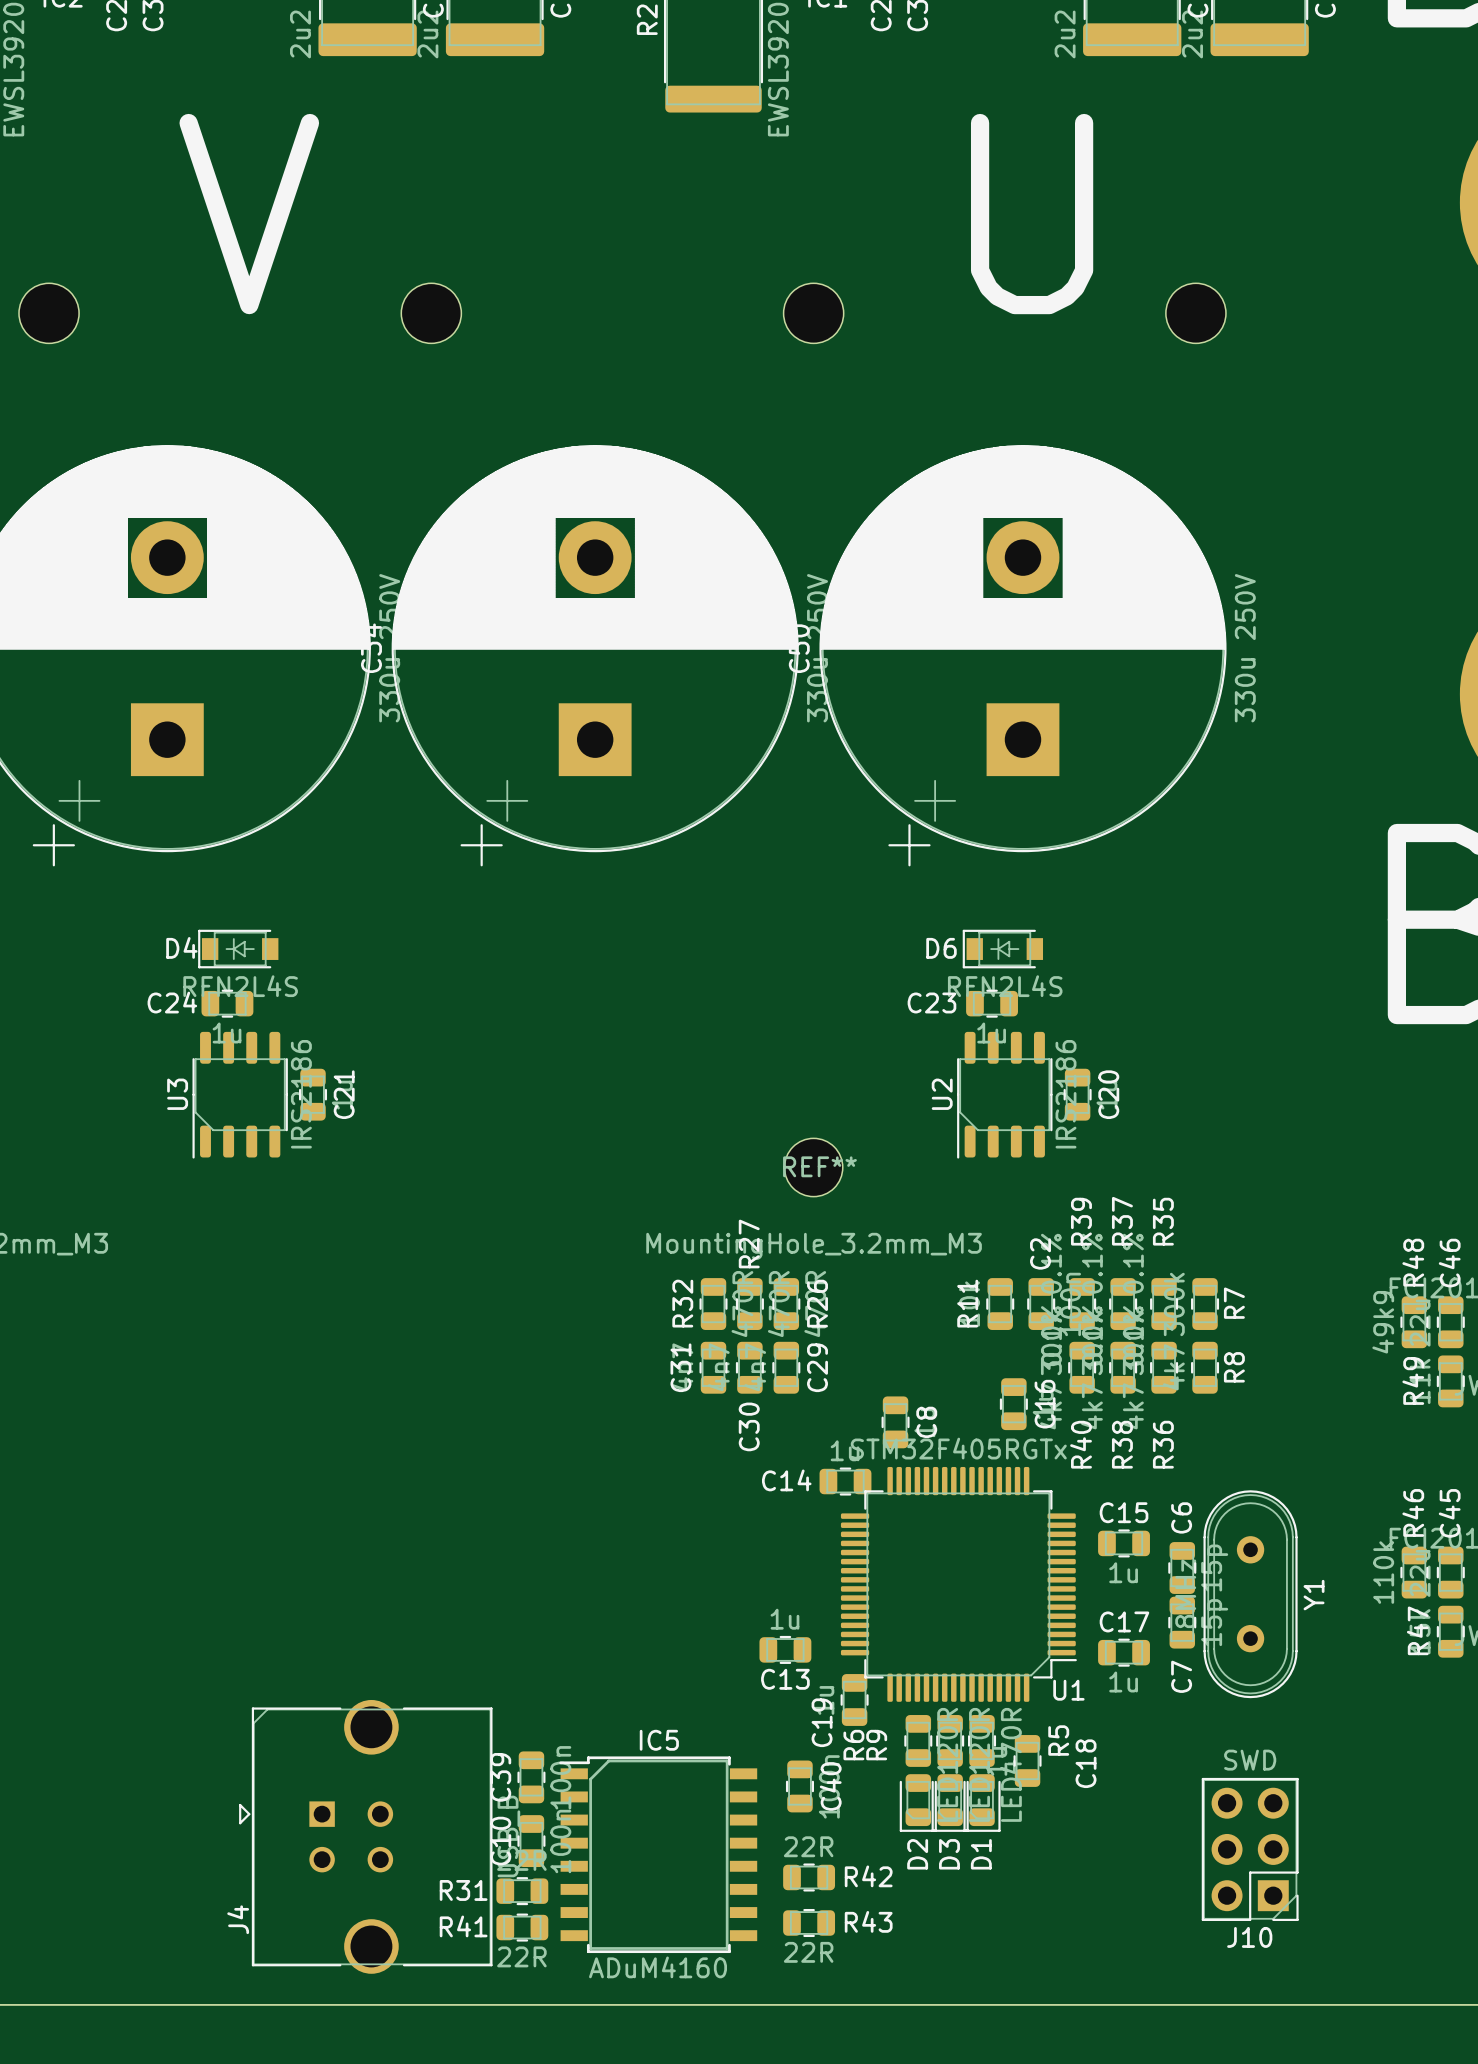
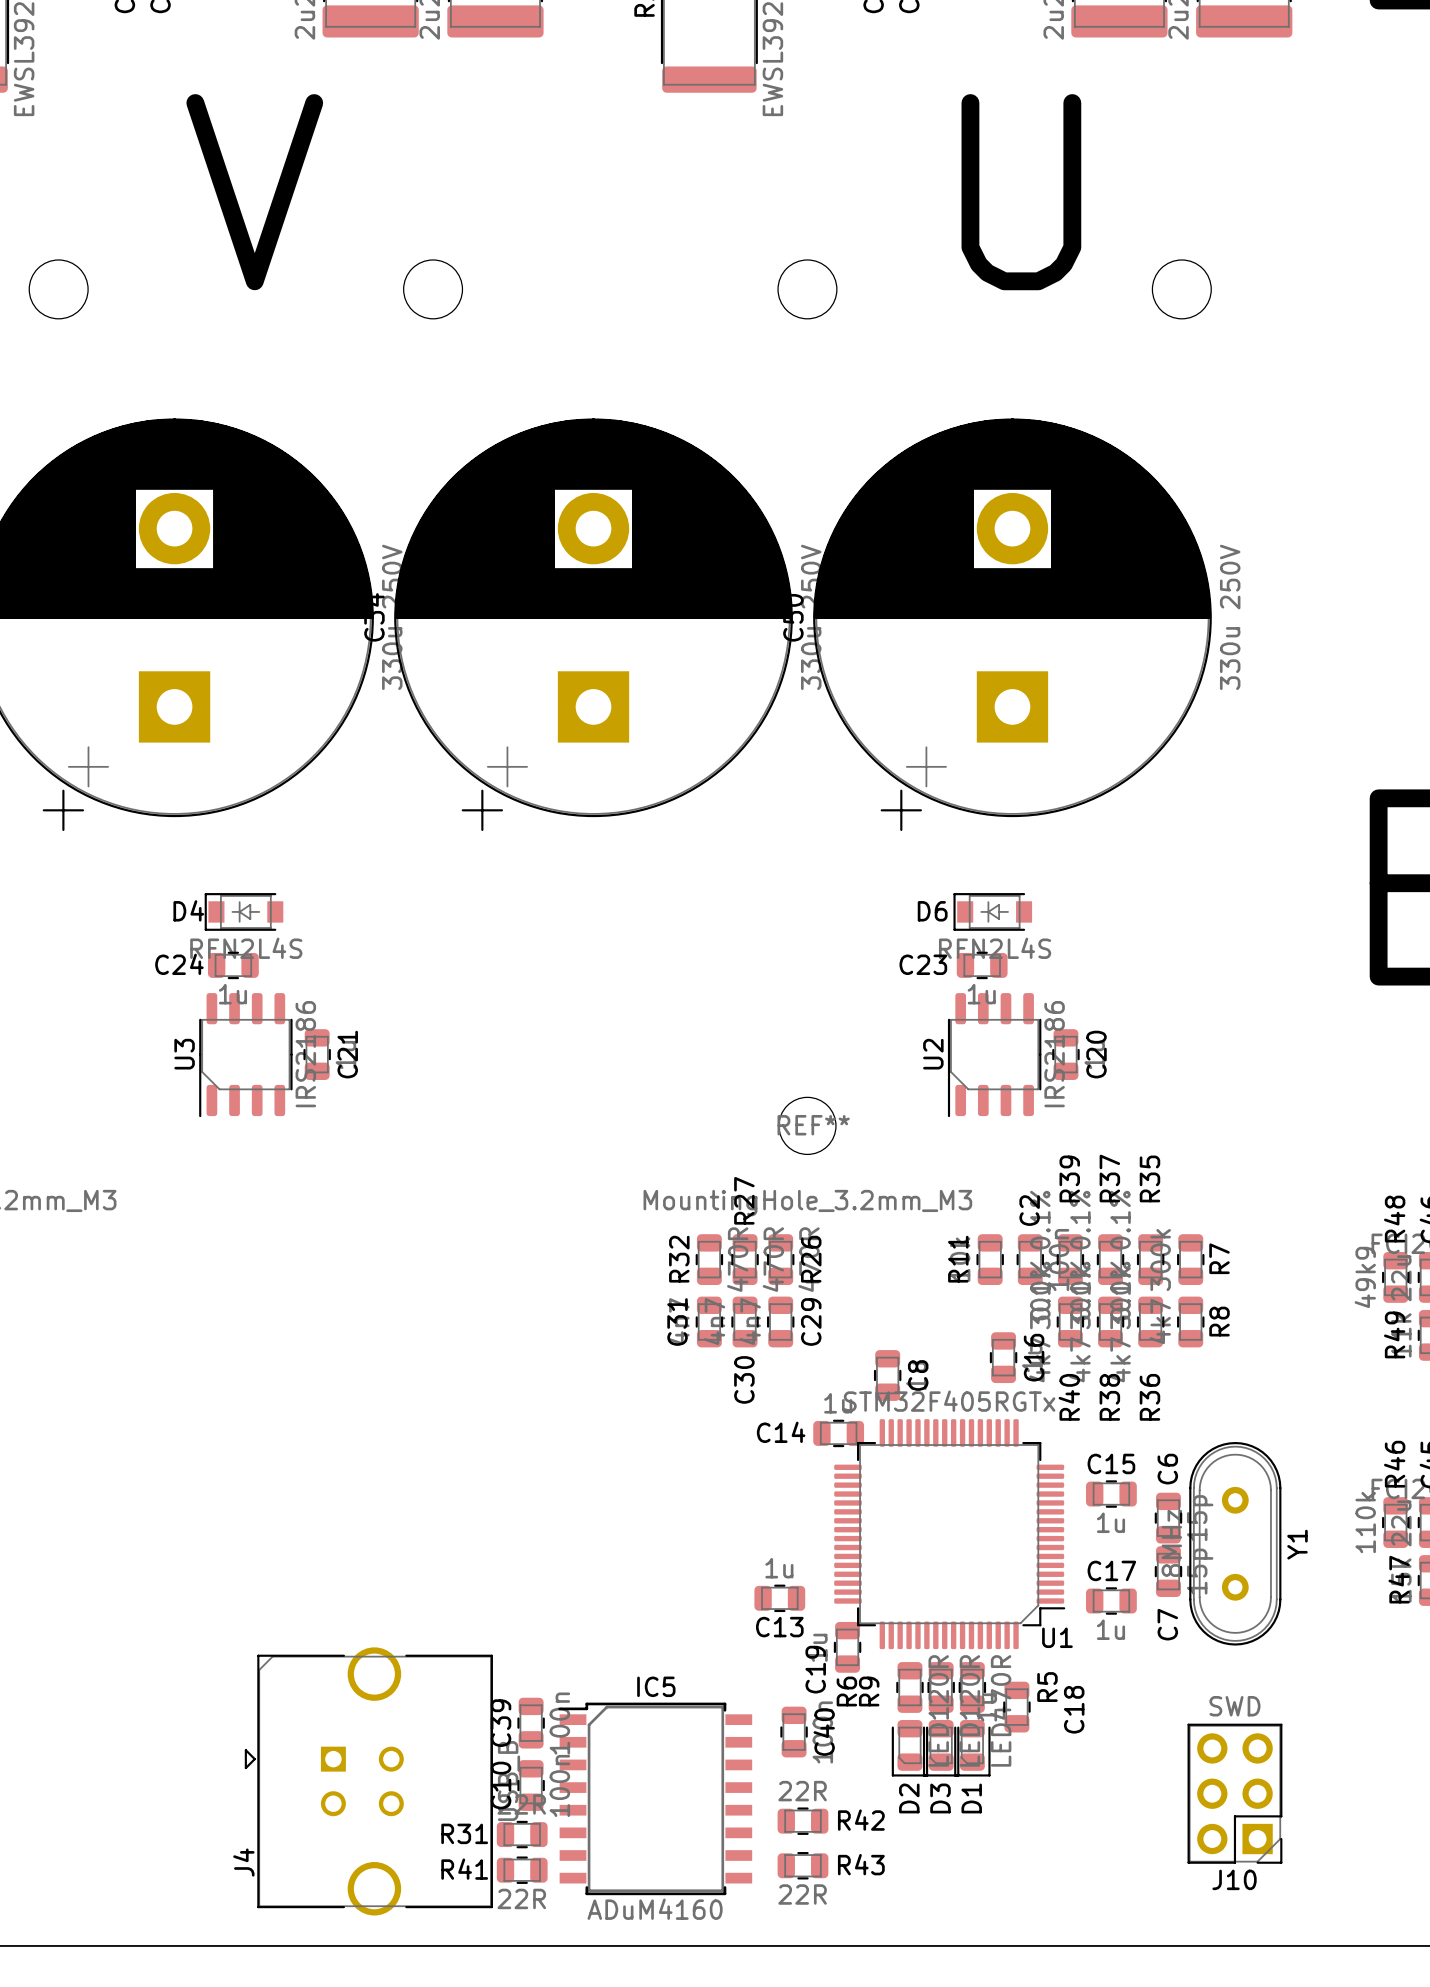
J4 footprint: [239, 1699, 493, 1974] -> [244, 1647, 493, 1916]

